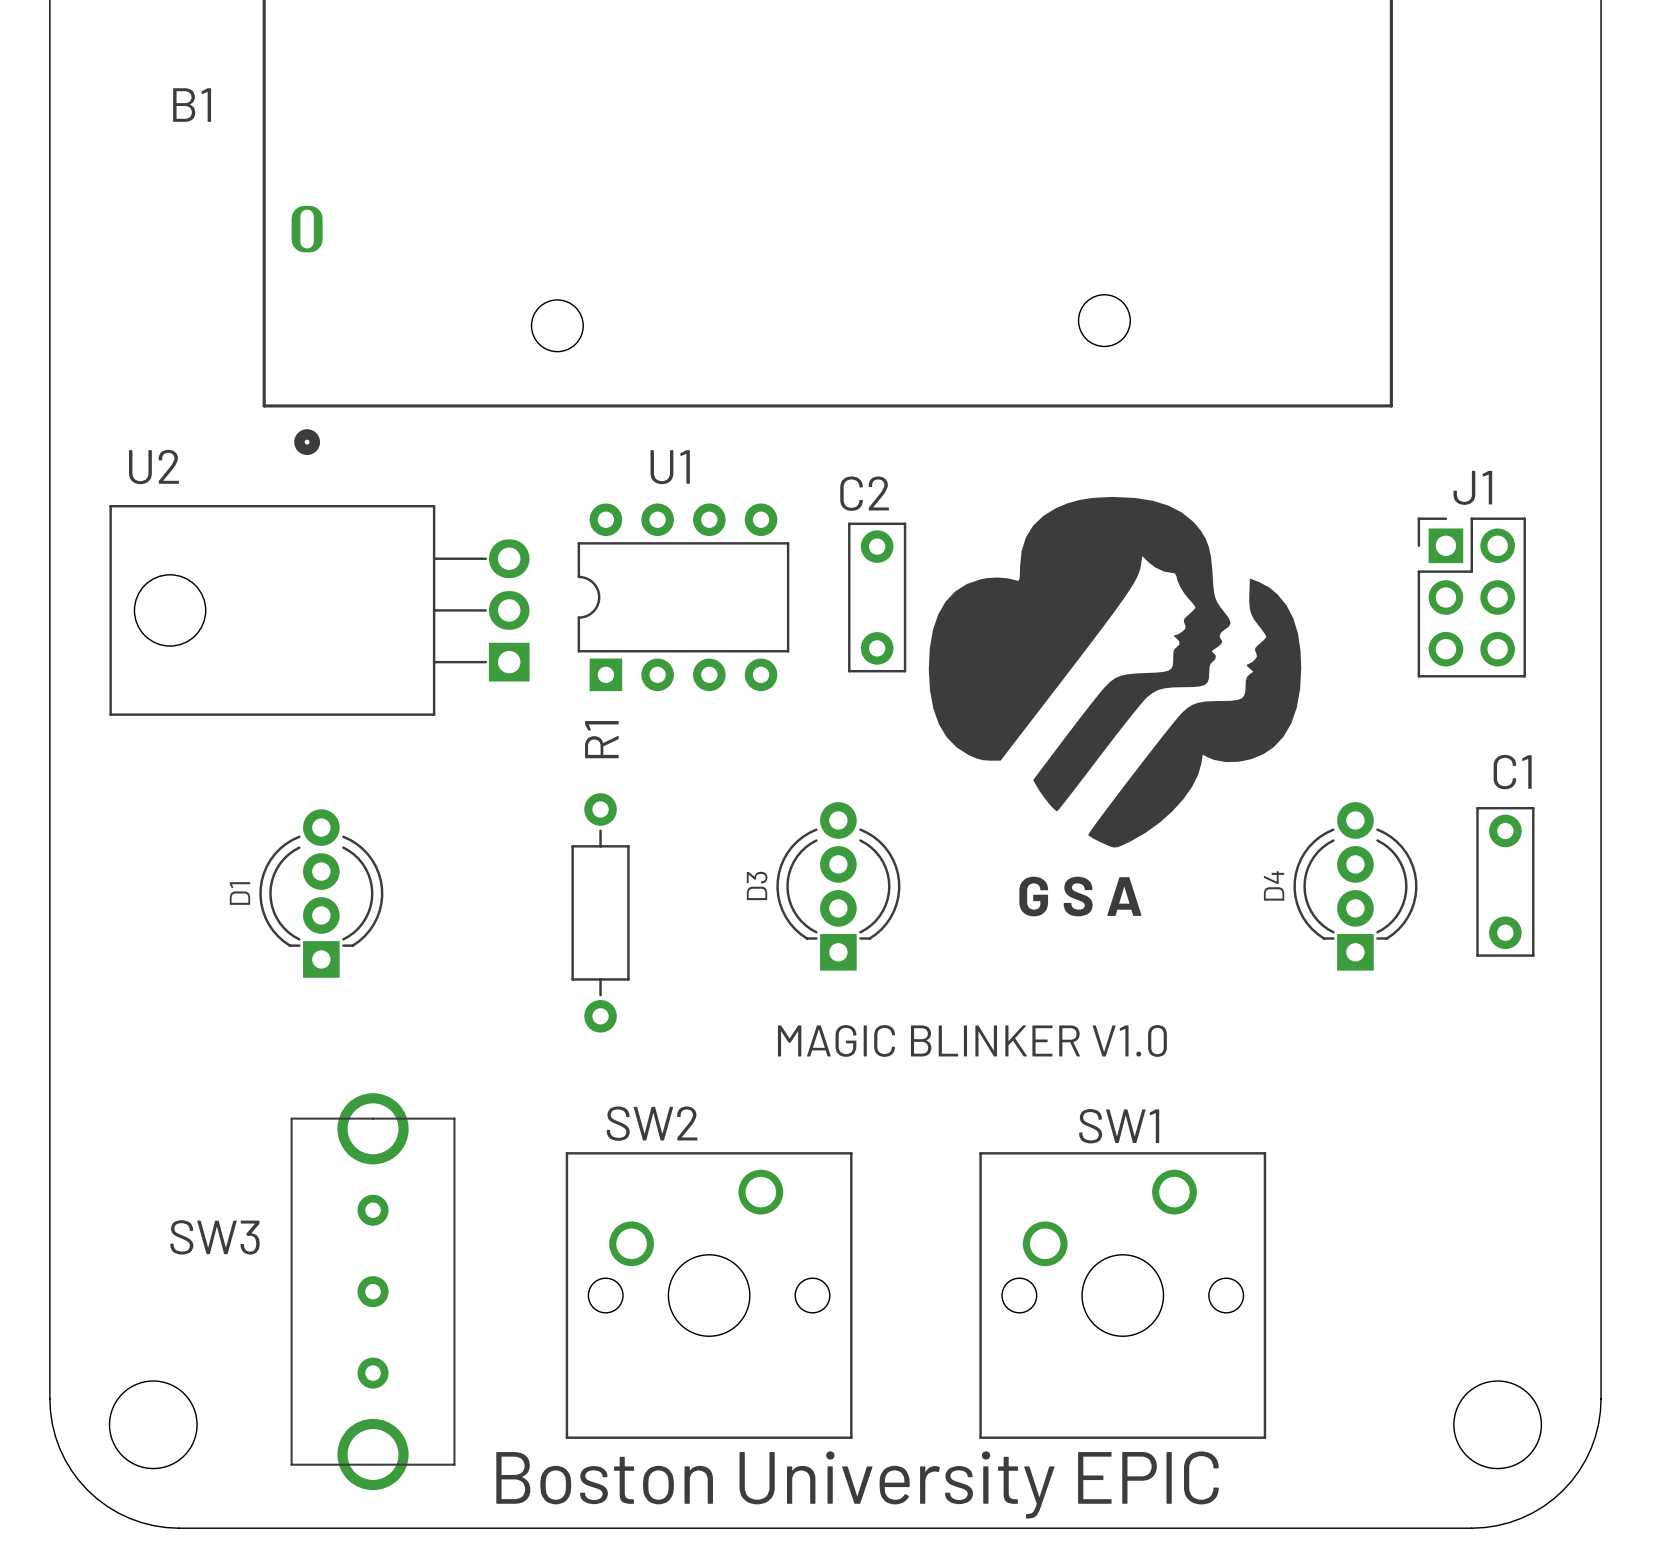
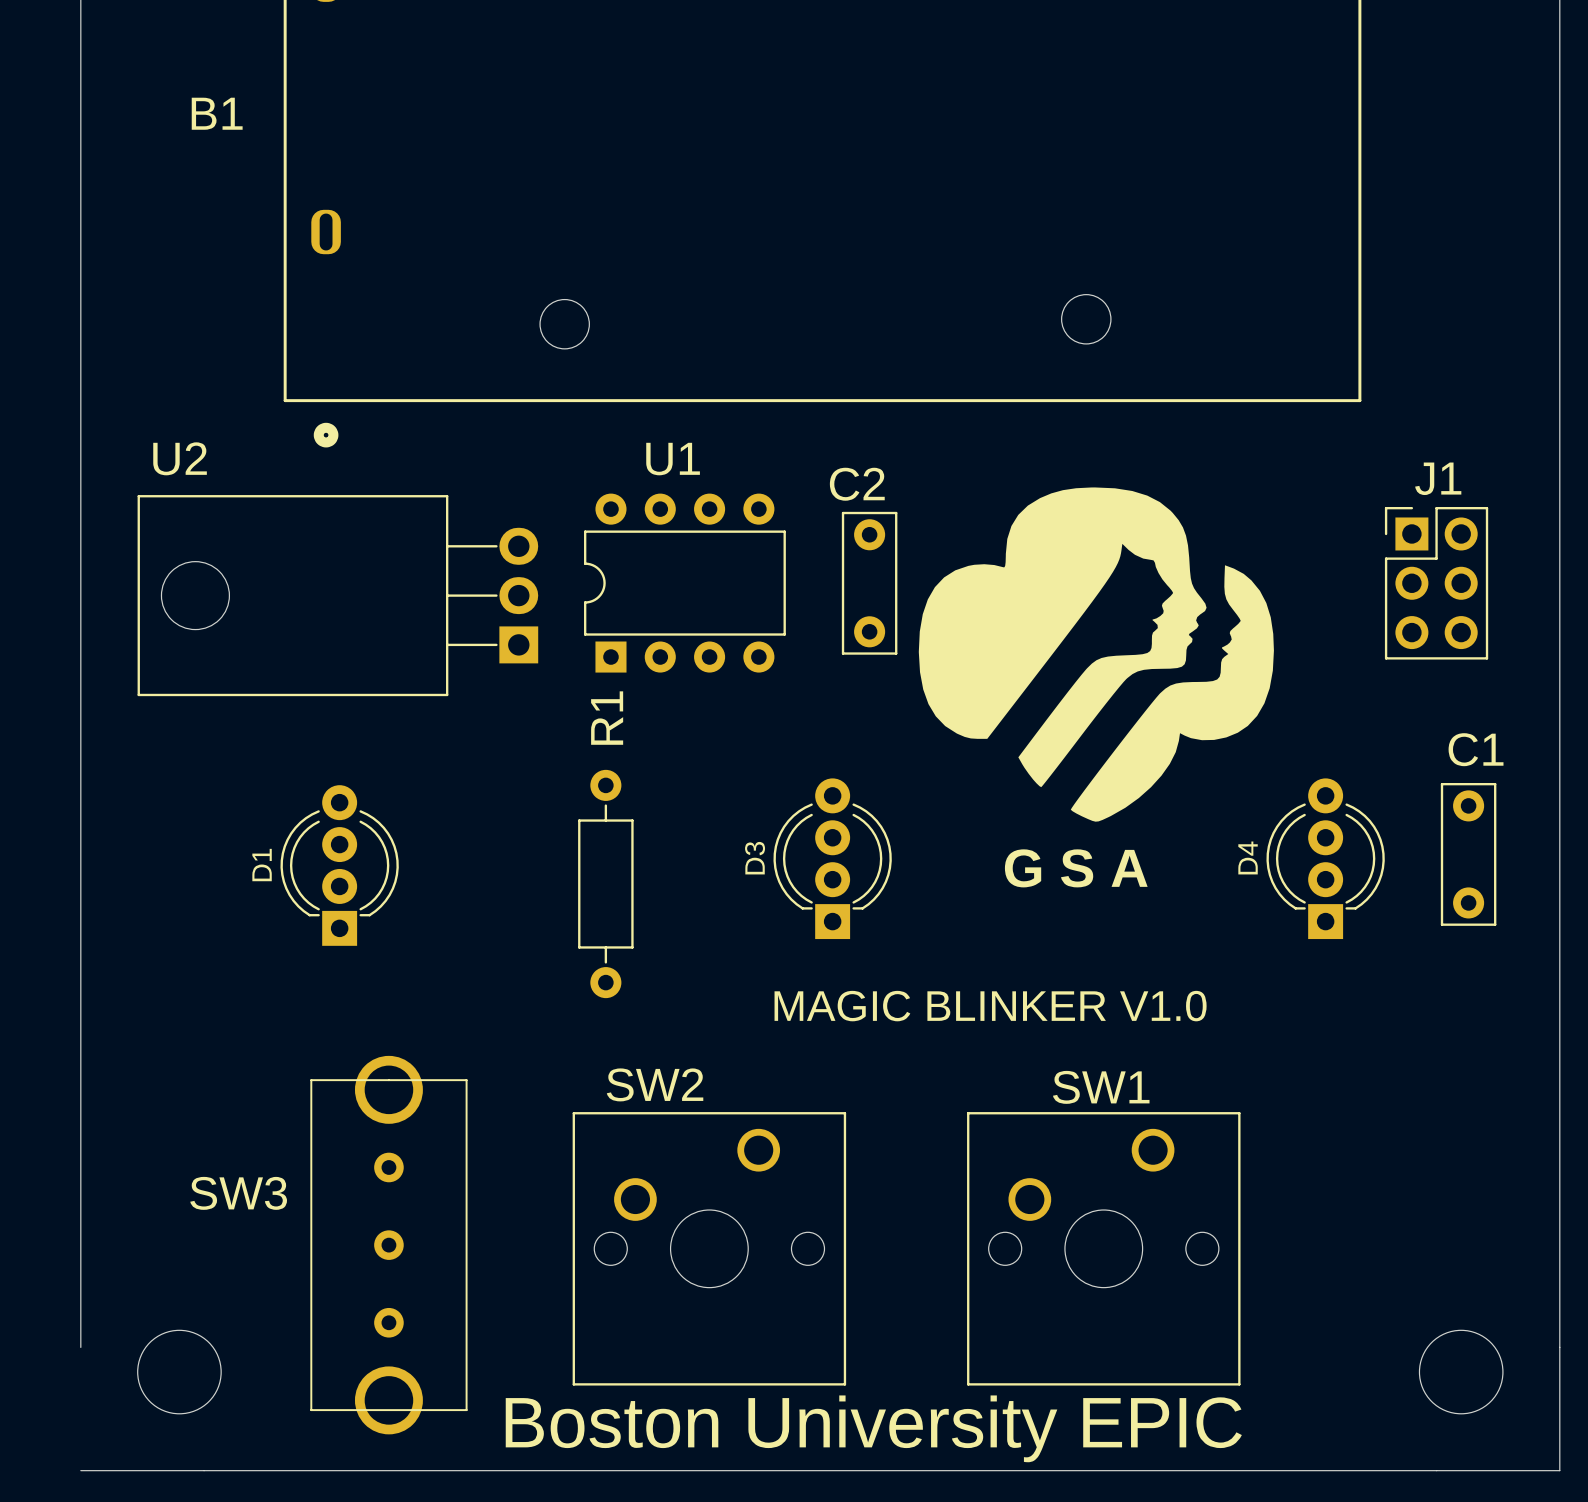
board edge: (49, 1398) (52, 1424) (59, 1448) (71, 1470) (87, 1490) (107, 1506) (129, 1518) (153, 1525) (179, 1528) -> (80, 1470) (204, 1470)
board edge: (1601, 1398) (1598, 1424) (1591, 1448) (1579, 1470) (1563, 1490) (1543, 1506) (1521, 1518) (1497, 1525) (1471, 1528) -> (1559, 1347) (1559, 1470) (1436, 1470)

